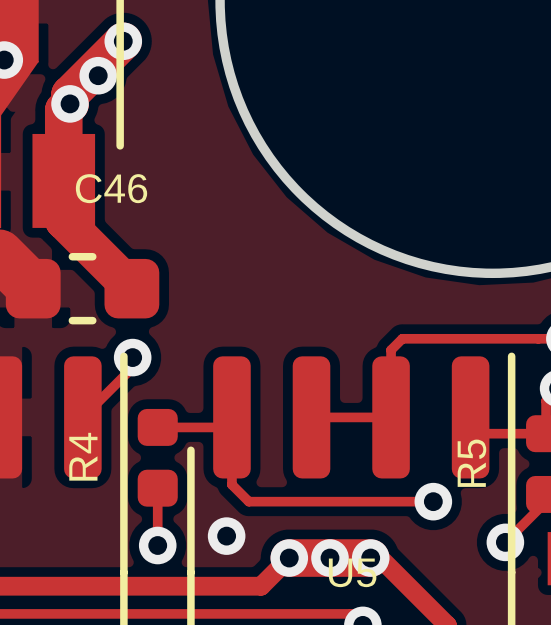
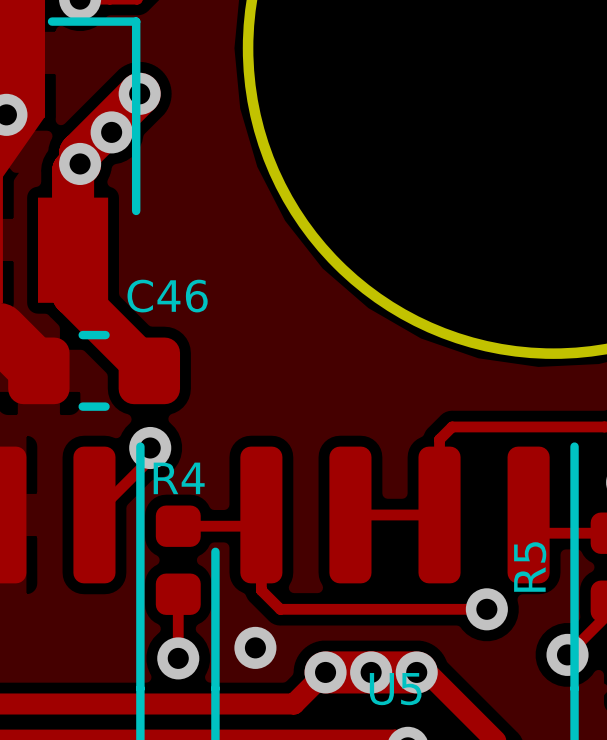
C46 name position: C46 (111, 188) -> C46 (167, 296)
R4 name rotation: 0° (83, 456) -> 90° clockwise (179, 478)
R4 name position: R4 (83, 456) -> R4 (179, 478)

